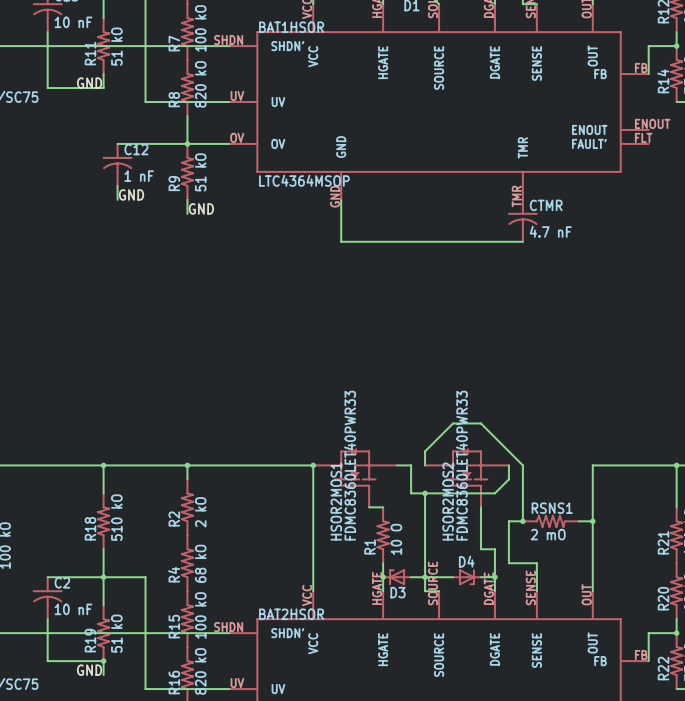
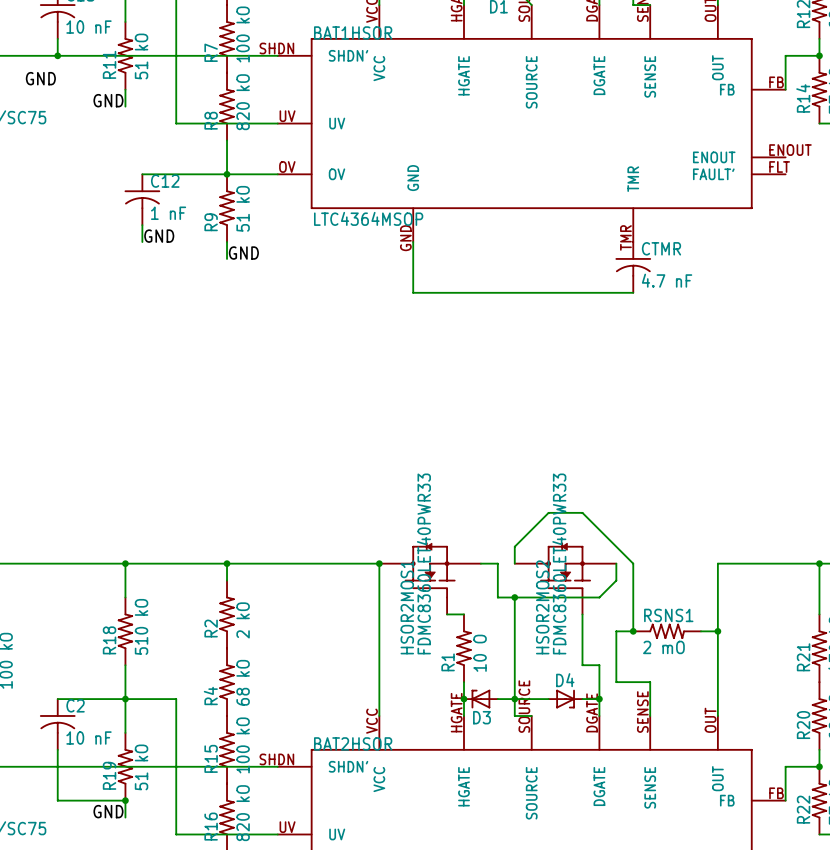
wire: (47, 46) (47, 88) (103, 88) -> none
junction: none -> (57, 55)
label: none -> GND (40, 78)

